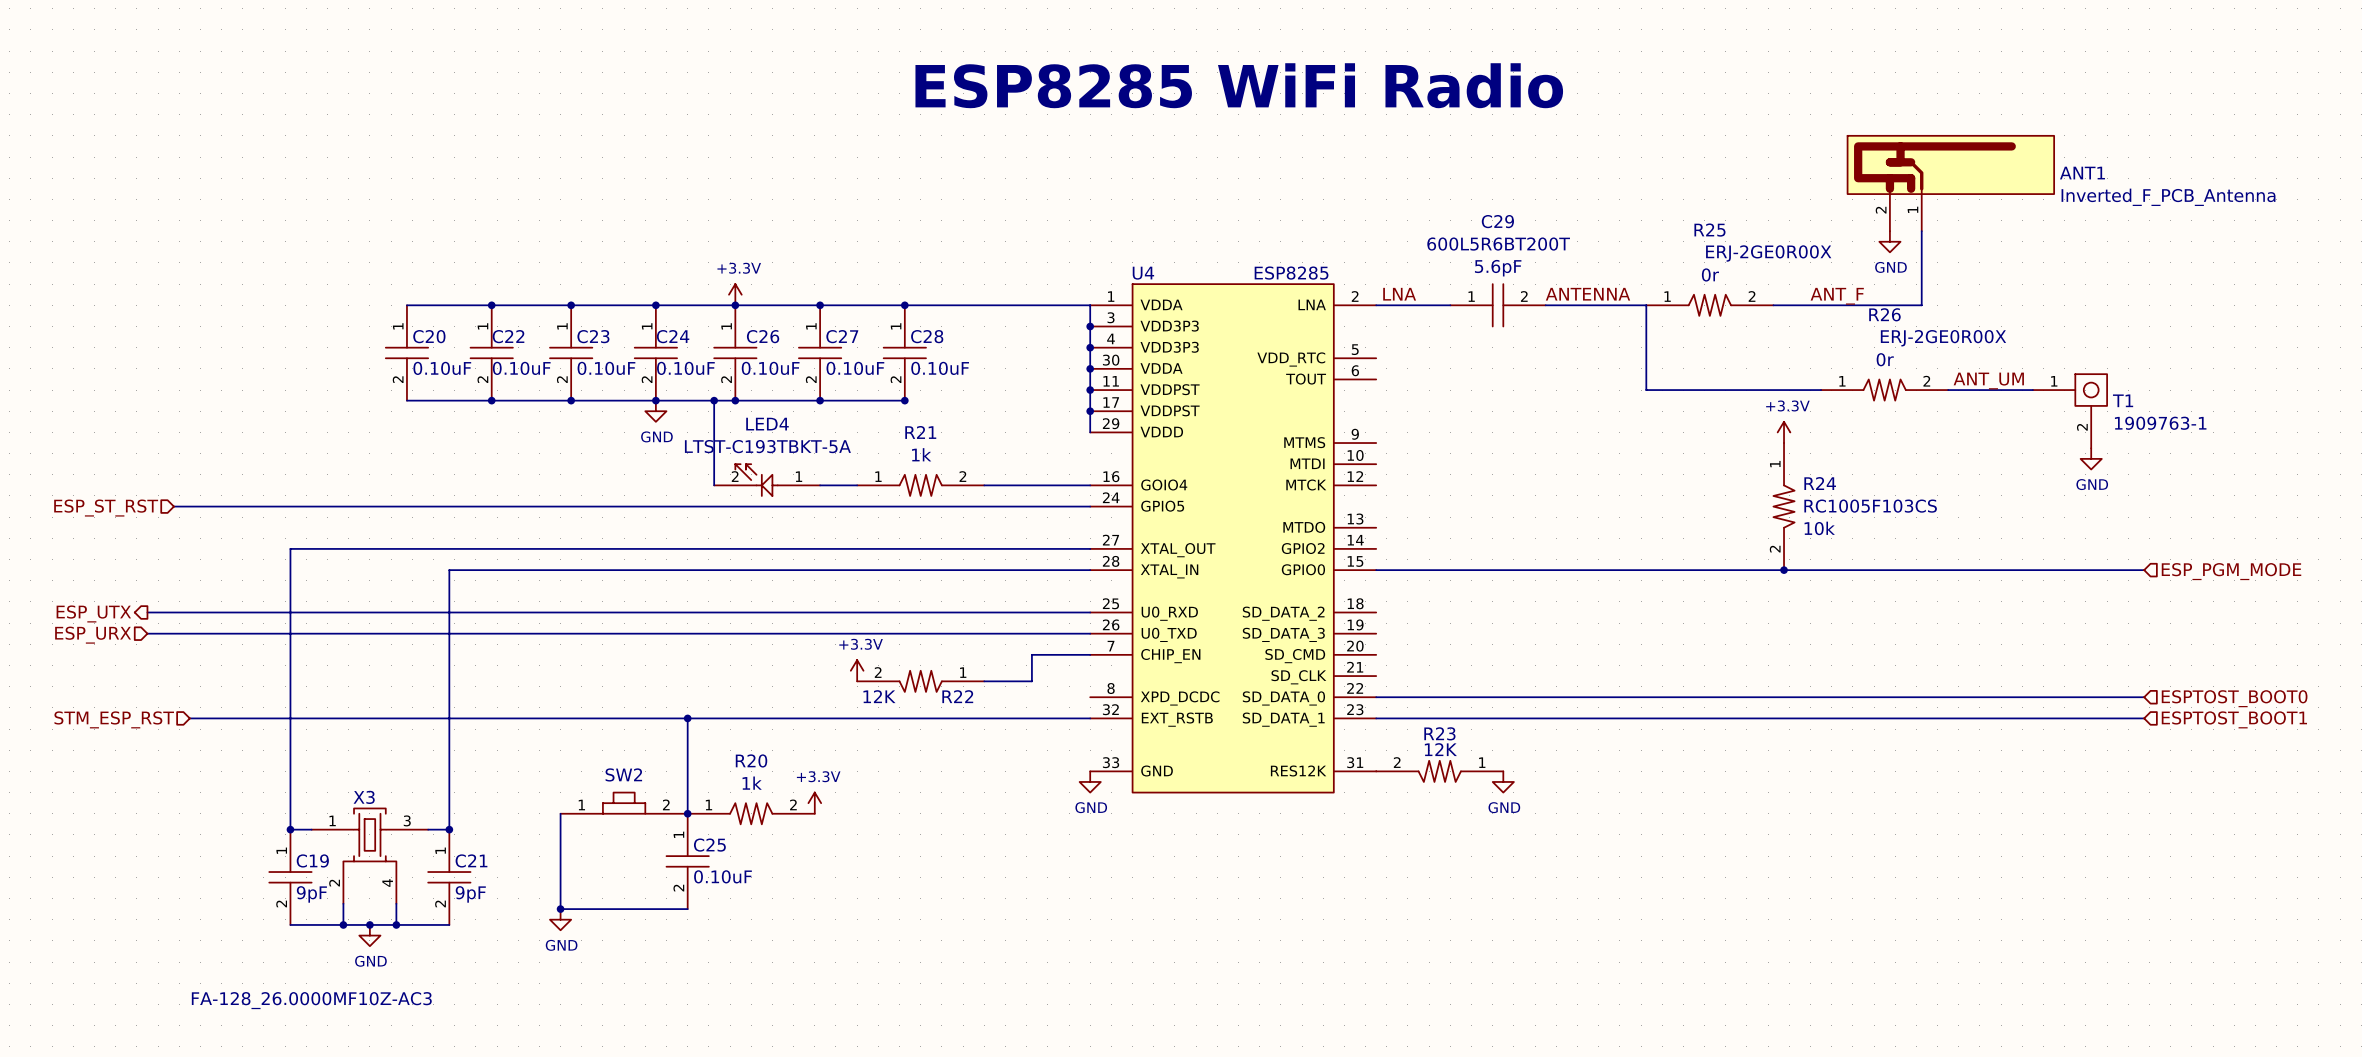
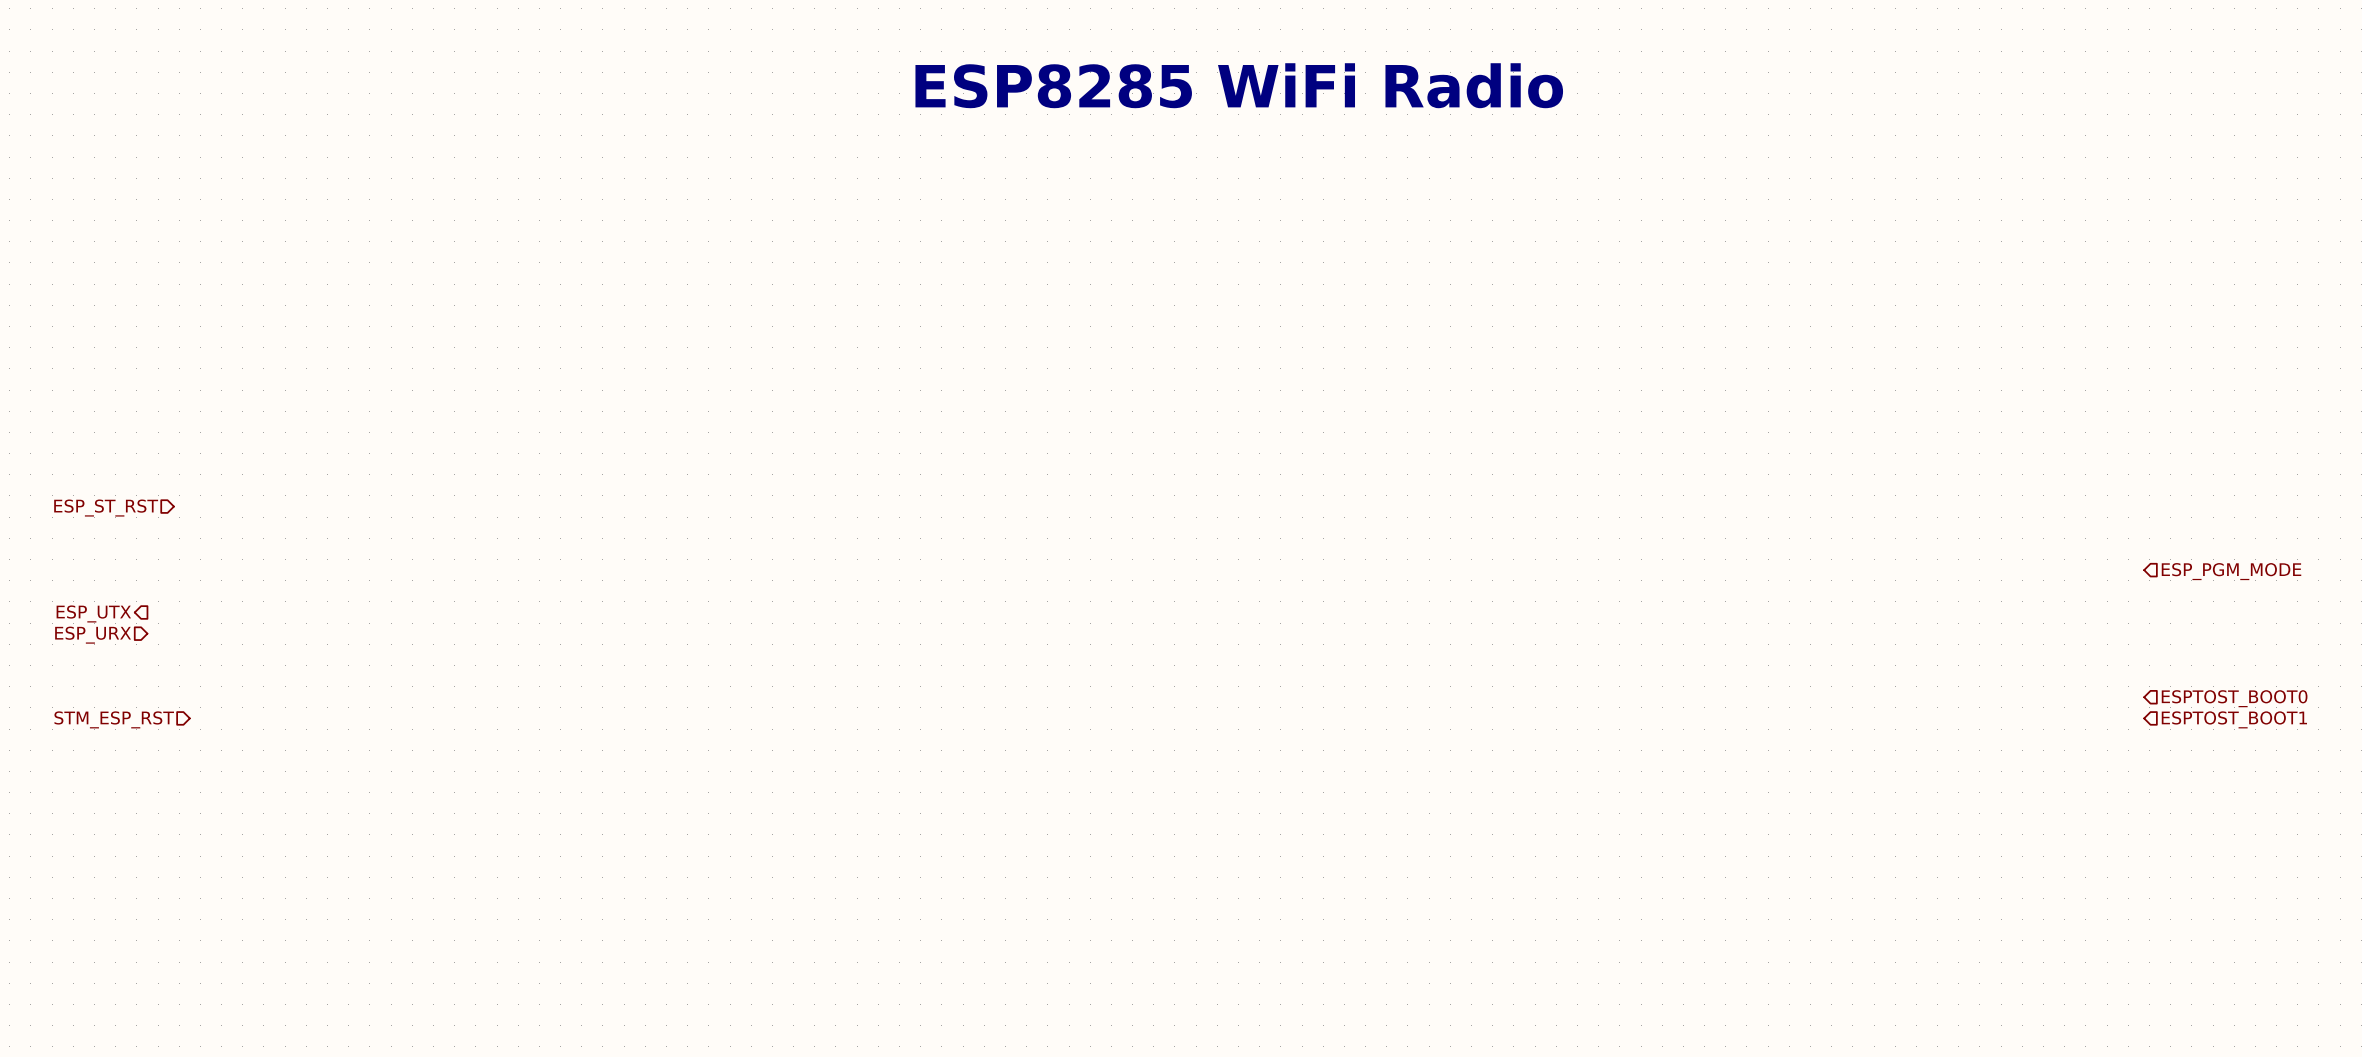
ANT1: Inverted_F_PCB_Antenna (1950, 183) -> none
wire: (1921, 231) (1921, 305) (1773, 305) -> none
power symbol: GND (1889, 241) -> none
power symbol: +3.3V (735, 294) -> none
label: LNA (1399, 294) -> none
label: ANTENNA (1588, 294) -> none
label: ANT_F (1837, 296) -> none
wire: (406, 305) (1090, 305) (1090, 432) -> none
junction: (491, 305) -> none
junction: (571, 305) -> none
junction: (655, 305) -> none
junction: (735, 305) -> none
junction: (820, 305) -> none
junction: (904, 305) -> none
wire: (1376, 305) (1450, 305) -> none
C29: 600L5R6BT200T (1498, 305) -> none
wire: (1545, 305) (1646, 305) (1646, 390) (1821, 390) -> none
R25: ERJ-2GE0R00X (1709, 305) -> none
junction: (1090, 326) -> none
junction: (1090, 347) -> none
C20: (406, 352) -> none
C22: (491, 352) -> none
C23: (571, 352) -> none
C24: (655, 352) -> none
C26: (735, 352) -> none
C27: (820, 352) -> none
C28: (904, 352) -> none
junction: (1090, 368) -> none
label: ANT_UM (1988, 381) -> none
junction: (1090, 390) -> none
R26: ERJ-2GE0R00X (1884, 390) -> none
wire: (1948, 390) (2032, 390) -> none
wire: (406, 400) (904, 400) -> none
junction: (491, 400) -> none
junction: (571, 400) -> none
junction: (655, 400) -> none
wire: (714, 400) (714, 485) -> none
junction: (714, 400) -> none
junction: (735, 400) -> none
junction: (820, 400) -> none
junction: (904, 400) -> none
power symbol: GND (655, 411) -> none
junction: (1090, 411) -> none
T1: 1909763-1 (2070, 411) -> none
power symbol: +3.3V (1784, 432) -> none
power symbol: GND (2091, 458) -> none
LED4: LTST-C193TBKT-5A (767, 480) -> none
wire: (820, 485) (857, 485) -> none
R21: (920, 485) -> none
wire: (984, 485) (1090, 485) -> none
wire: (173, 506) (1090, 506) -> none
R24: RC1005F103CS (1784, 506) -> none
U4: ESP8285 (1233, 538) -> none
wire: (1090, 548) (290, 548) (290, 829) (311, 829) -> none
wire: (1090, 570) (449, 570) (449, 829) (428, 829) -> none
wire: (1376, 570) (2144, 570) -> none
junction: (1784, 570) -> none
wire: (147, 612) (1090, 612) -> none
wire: (147, 633) (1090, 633) -> none
wire: (1090, 654) (1031, 654) (1031, 681) (984, 681) -> none
power symbol: +3.3V (857, 670) -> none
R22: (920, 681) -> none
wire: (1376, 697) (2144, 697) -> none
wire: (189, 718) (1090, 718) -> none
wire: (687, 718) (687, 813) -> none
junction: (687, 718) -> none
wire: (1376, 718) (2144, 718) -> none
R23: (1439, 771) -> none
power symbol: GND (1090, 781) -> none
power symbol: GND (1503, 781) -> none
SW2: (624, 803) -> none
power symbol: +3.3V (814, 803) -> none
wire: (560, 813) (560, 909) (687, 909) -> none
junction: (687, 813) -> none
R20: (751, 813) -> none
junction: (290, 829) -> none
junction: (449, 829) -> none
X3: FA-128_26.0000MF10Z-AC3 (369, 856) -> none
C25: (687, 861) -> none
C19: (290, 877) -> none
C21: (449, 877) -> none
wire: (343, 903) (343, 924) -> none
wire: (396, 903) (396, 924) -> none
junction: (560, 909) -> none
power symbol: GND (560, 919) -> none
wire: (290, 924) (449, 924) -> none
junction: (343, 924) -> none
junction: (369, 924) -> none
junction: (396, 924) -> none
power symbol: GND (369, 935) -> none

